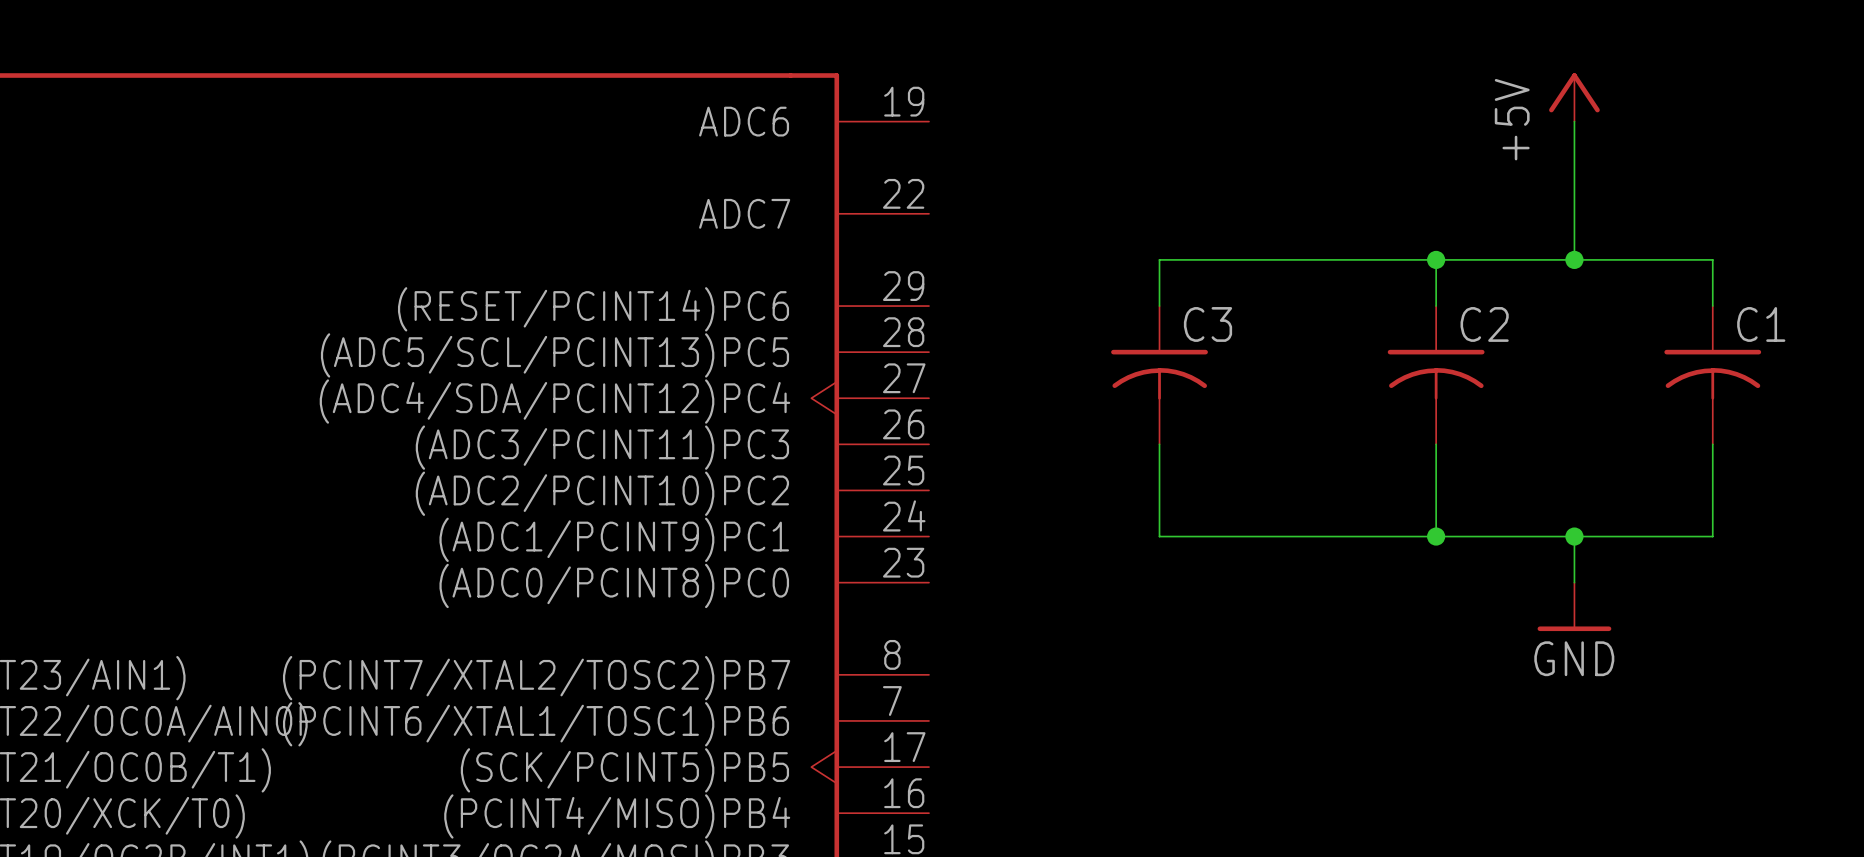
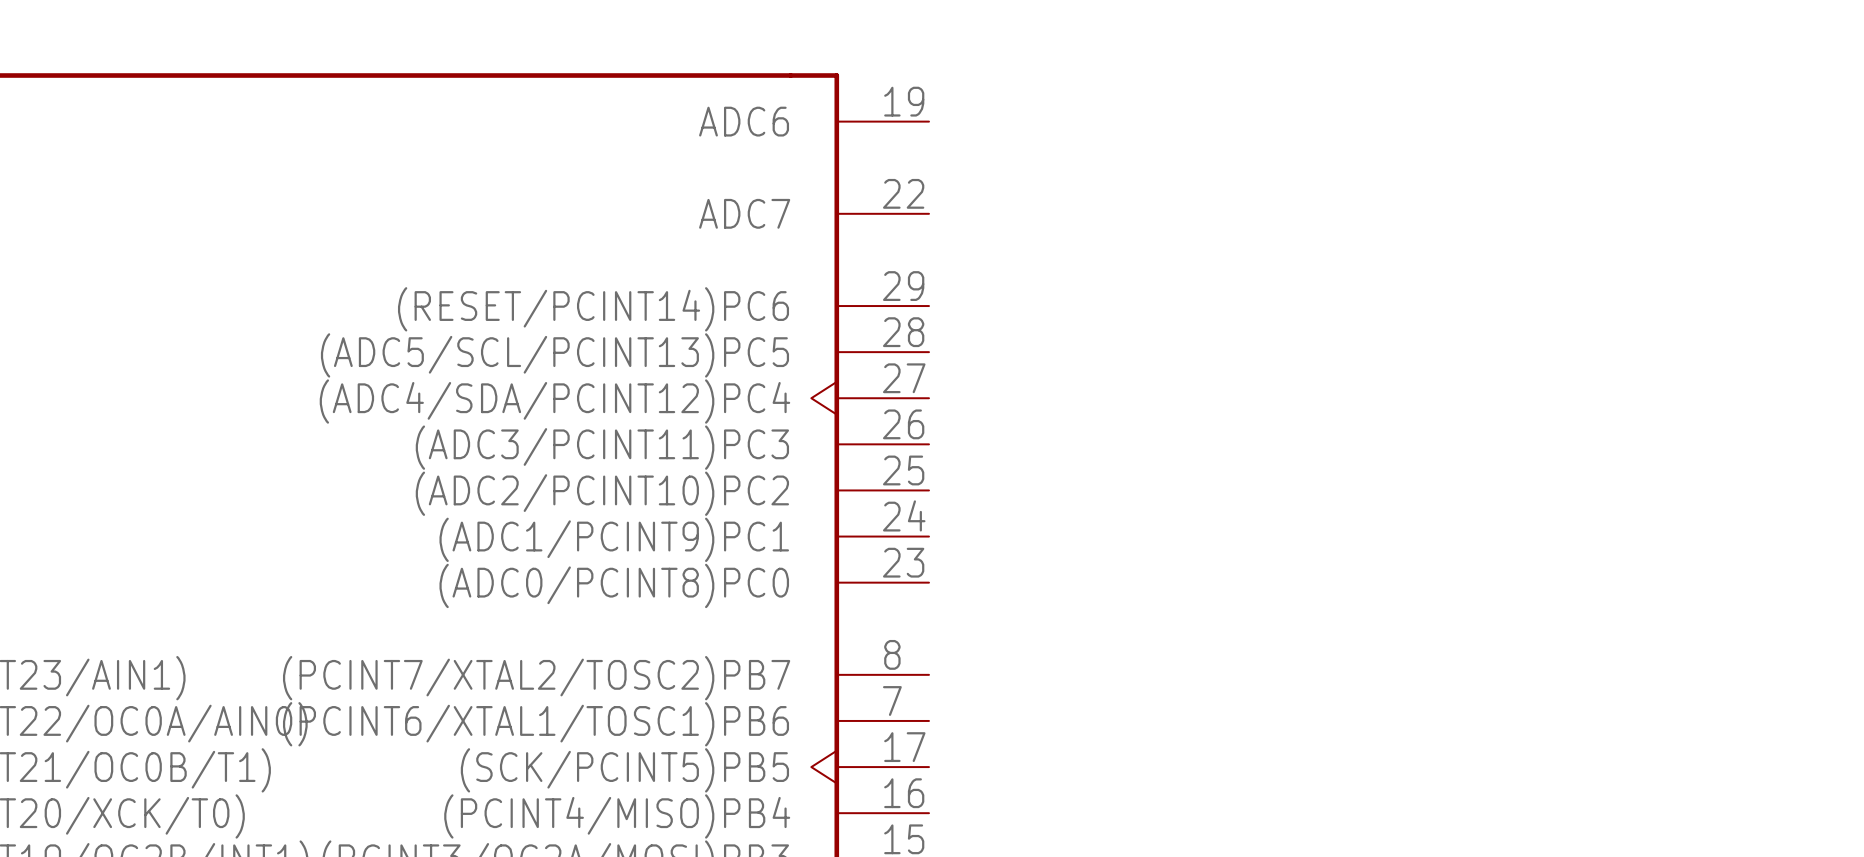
power symbol: +5V (1574, 97) -> none
wire: (1574, 121) (1574, 259) -> none
wire: (1436, 259) (1436, 306) -> none
junction: (1436, 259) -> none
junction: (1574, 259) -> none
wire: (1159, 306) (1159, 259) (1712, 259) (1712, 306) -> none
C3: (1159, 375) -> none
C2: (1436, 375) -> none
C1: (1712, 375) -> none
wire: (1159, 444) (1159, 536) (1712, 536) (1712, 444) -> none
wire: (1436, 444) (1436, 536) -> none
junction: (1436, 536) -> none
wire: (1574, 536) (1574, 582) -> none
junction: (1574, 536) -> none
power symbol: GND (1574, 606) -> none

